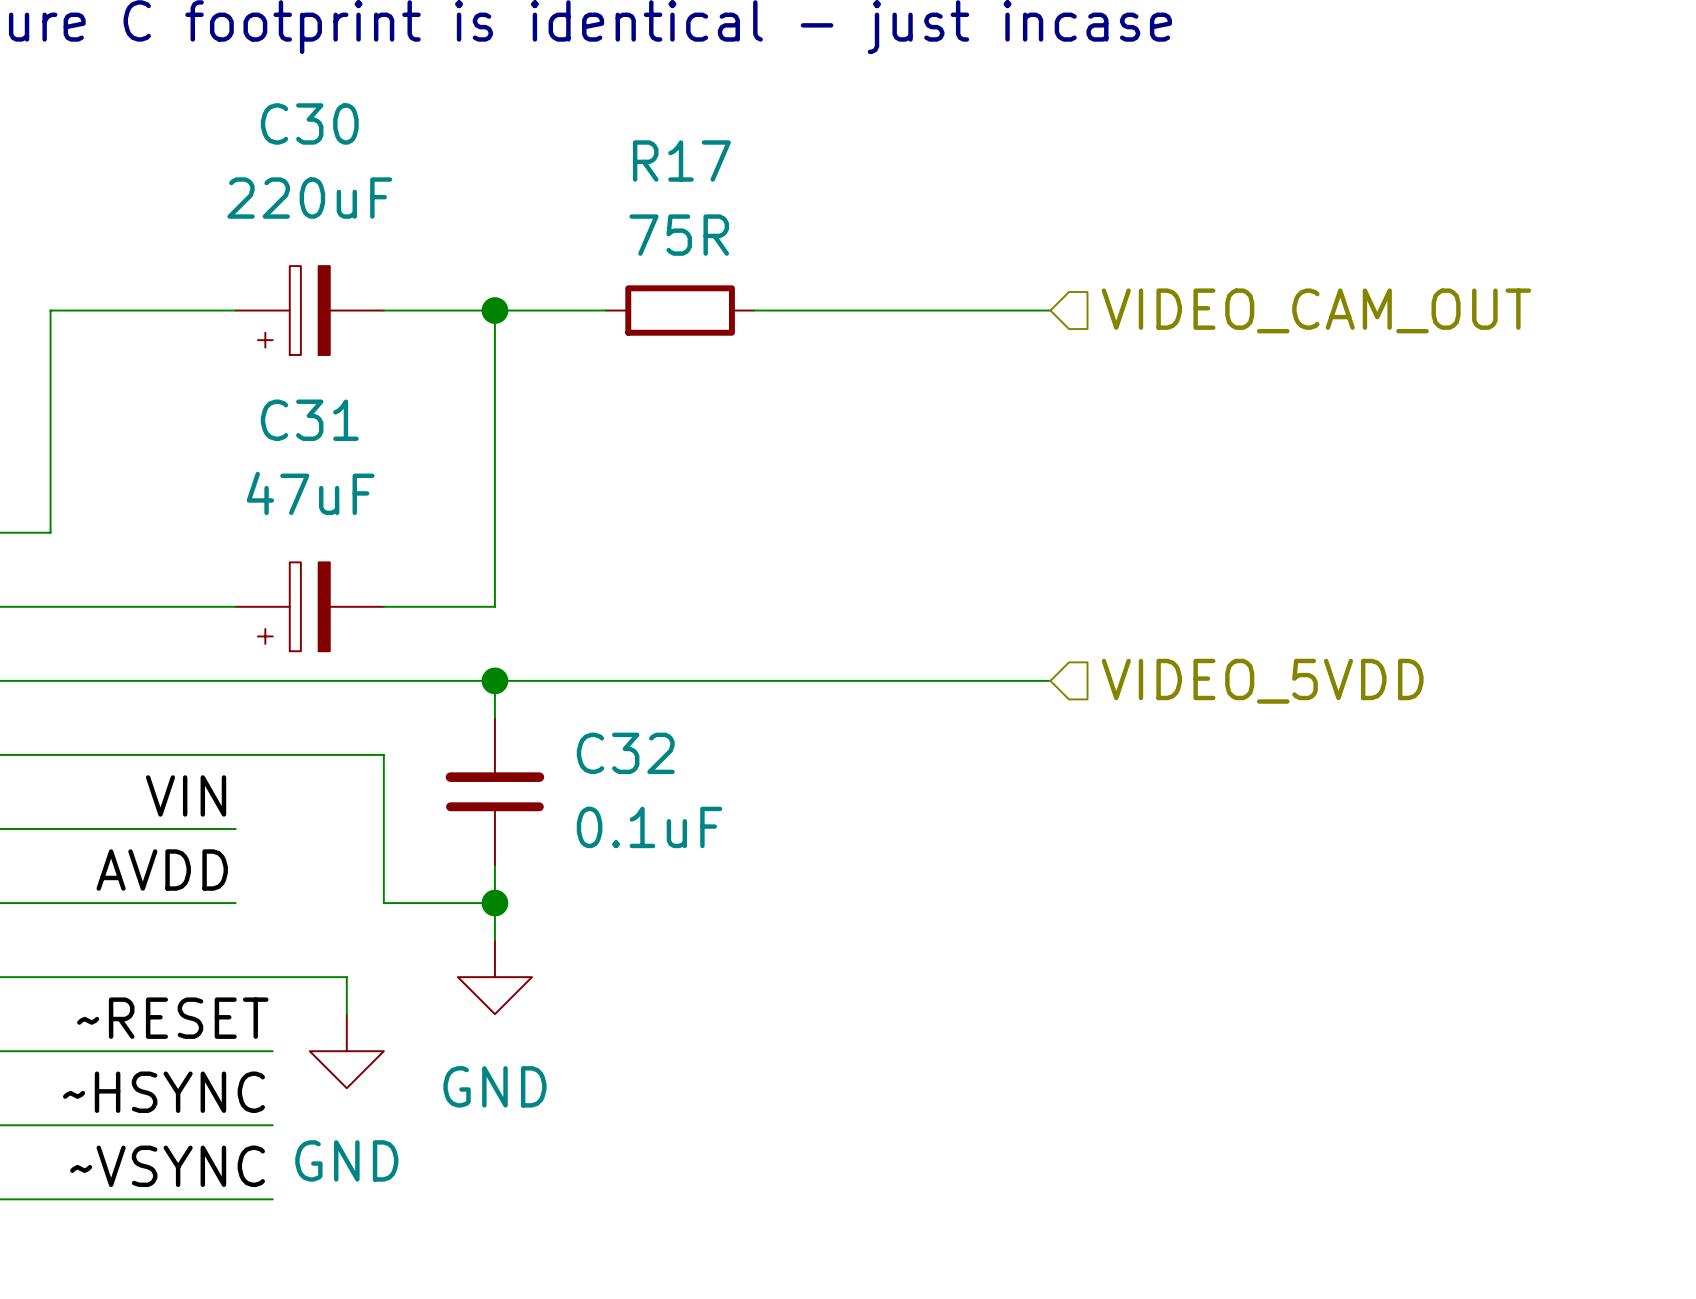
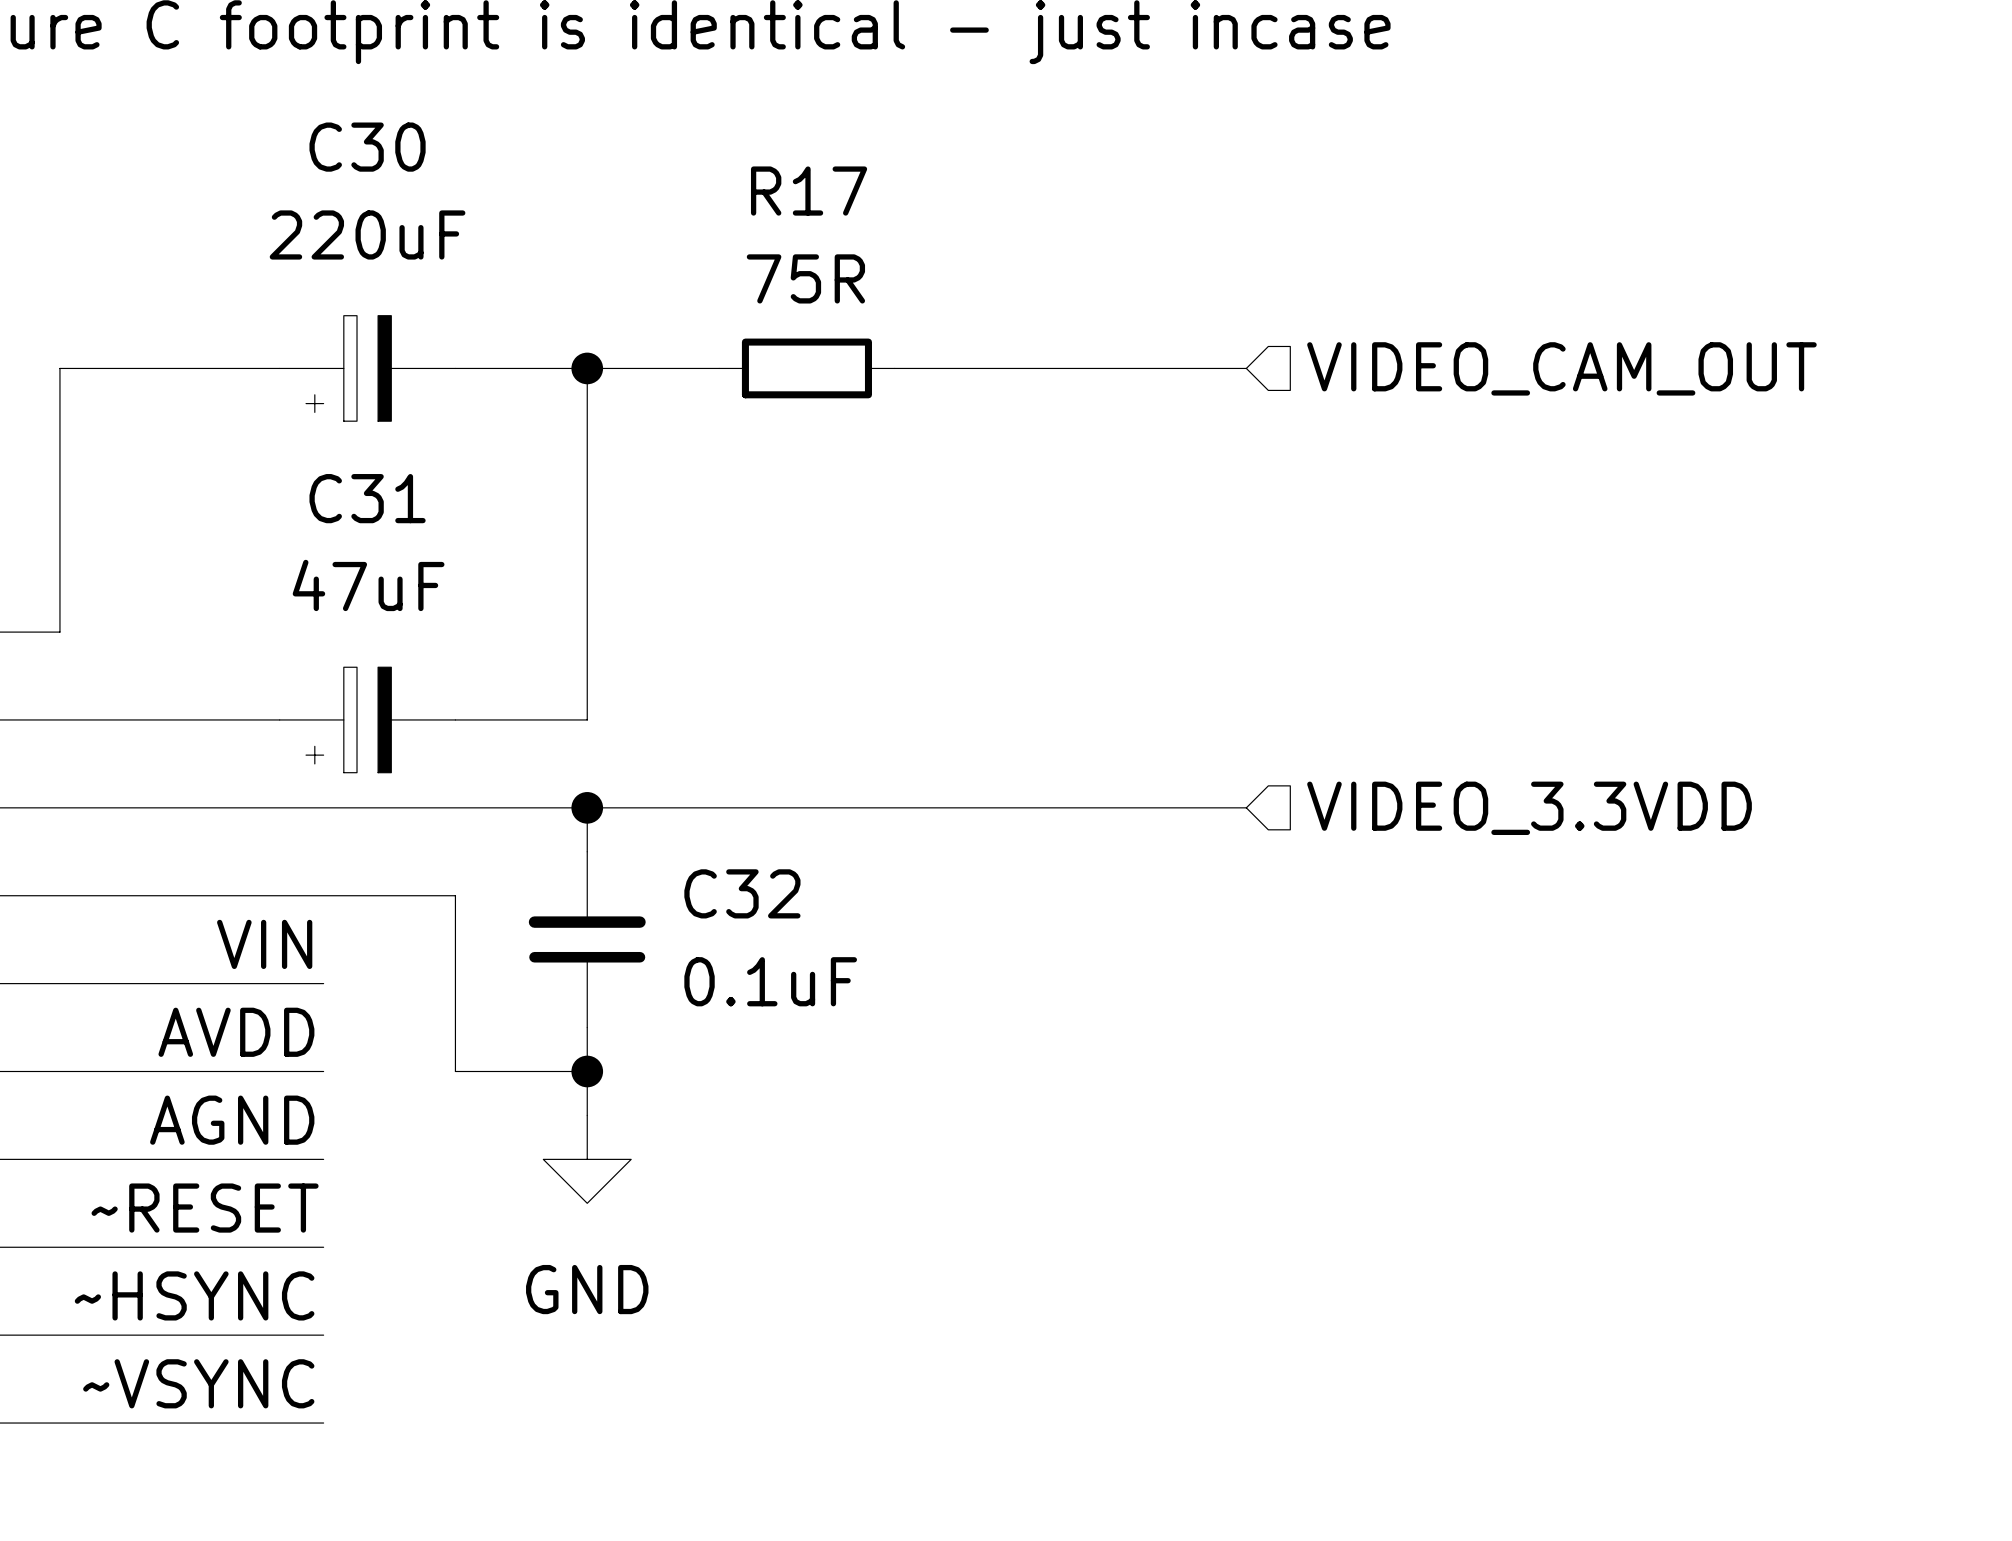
hierarchical label: VIDEO_5VDD (1262, 681) -> VIDEO_3.3VDD (1529, 808)
label position: VIN (186, 795) -> VIN (264, 944)
wire: none -> (279, 983) (323, 983)
label position: AVDD (162, 870) -> AVDD (236, 1032)
wire: none -> (279, 1071) (323, 1071)
label: none -> AGND (232, 1120)
wire: (272, 977) (346, 977) (346, 1014) -> none
power symbol: GND (346, 1051) -> none

